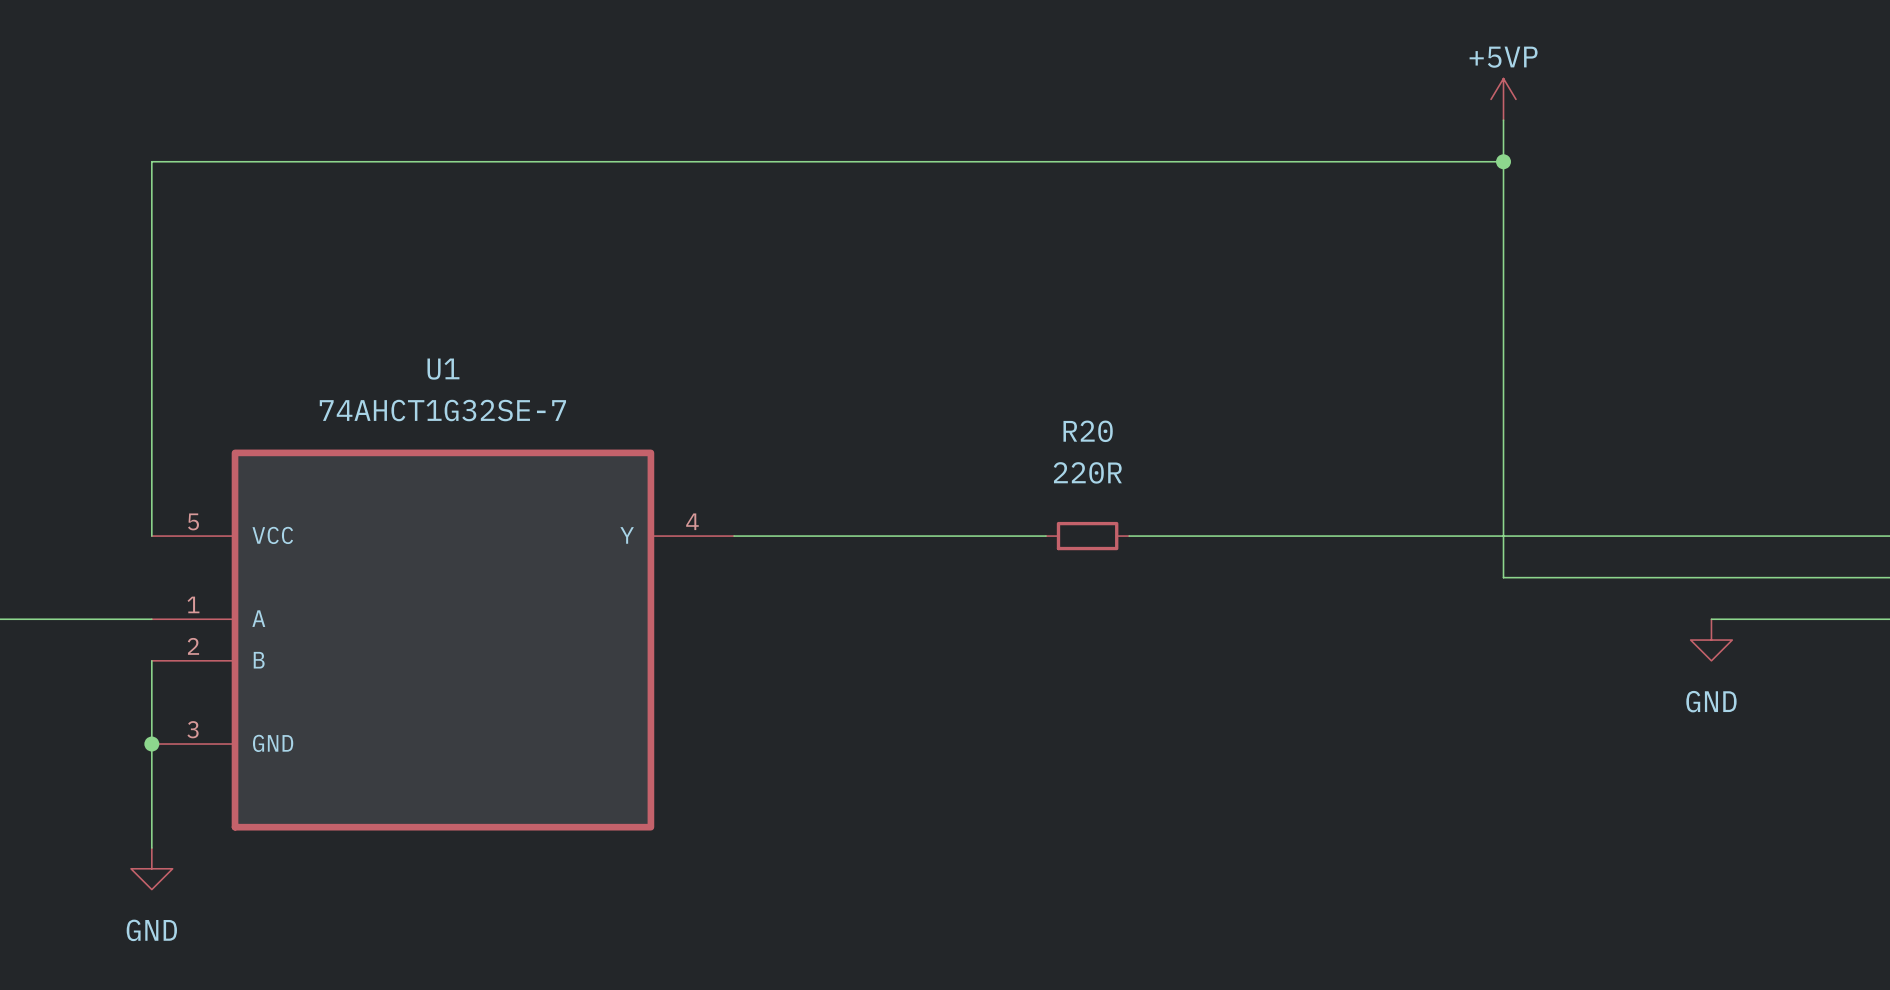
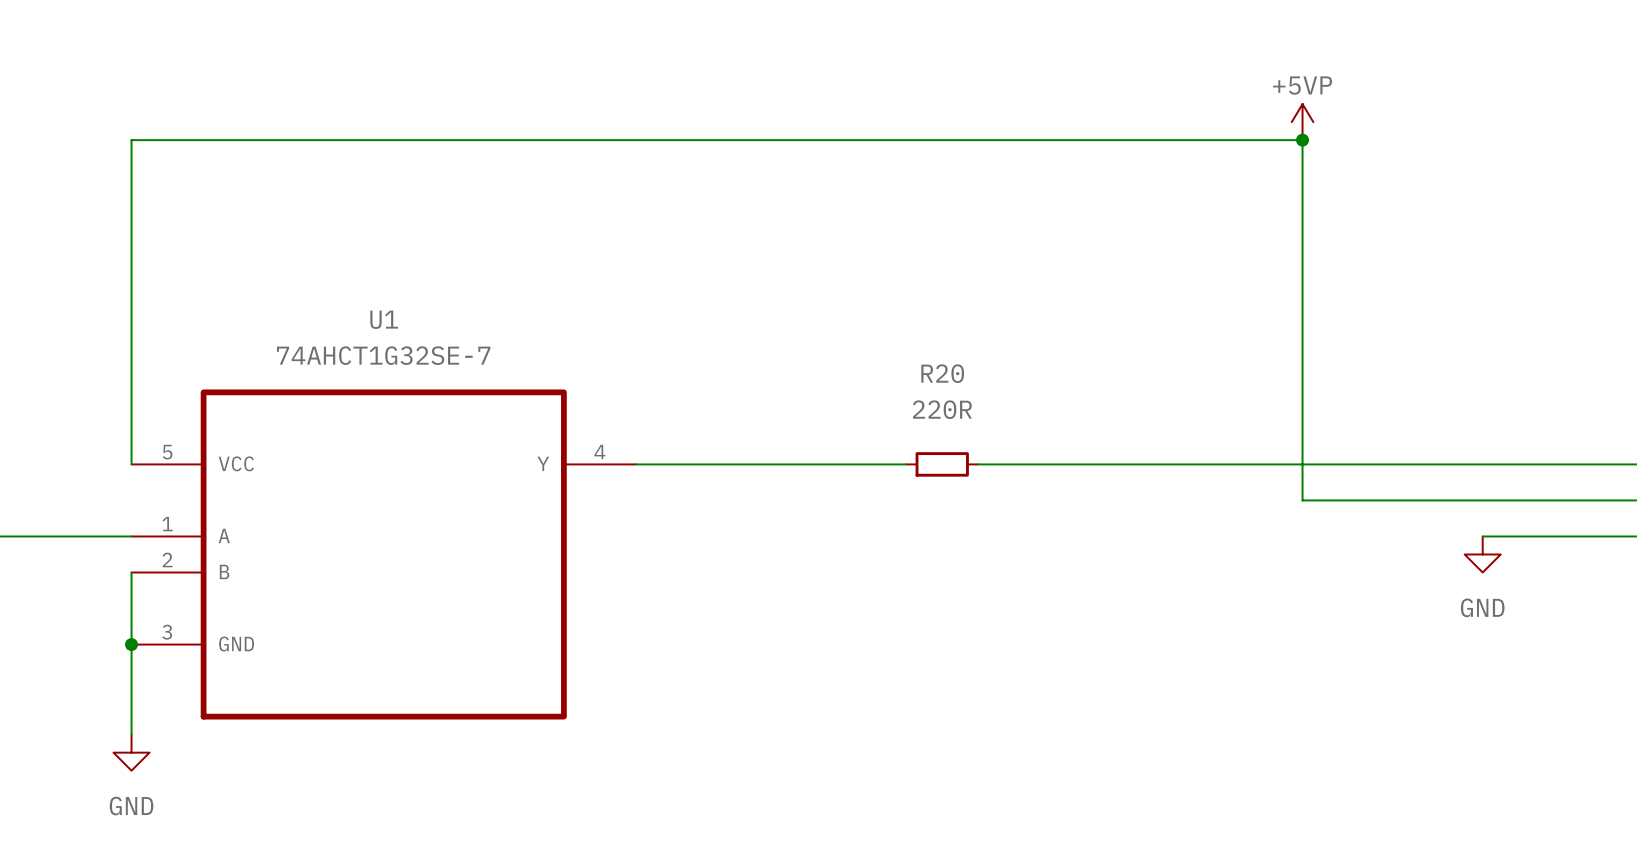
power symbol position: +5VP (1503, 99) -> +5VP (1302, 122)

